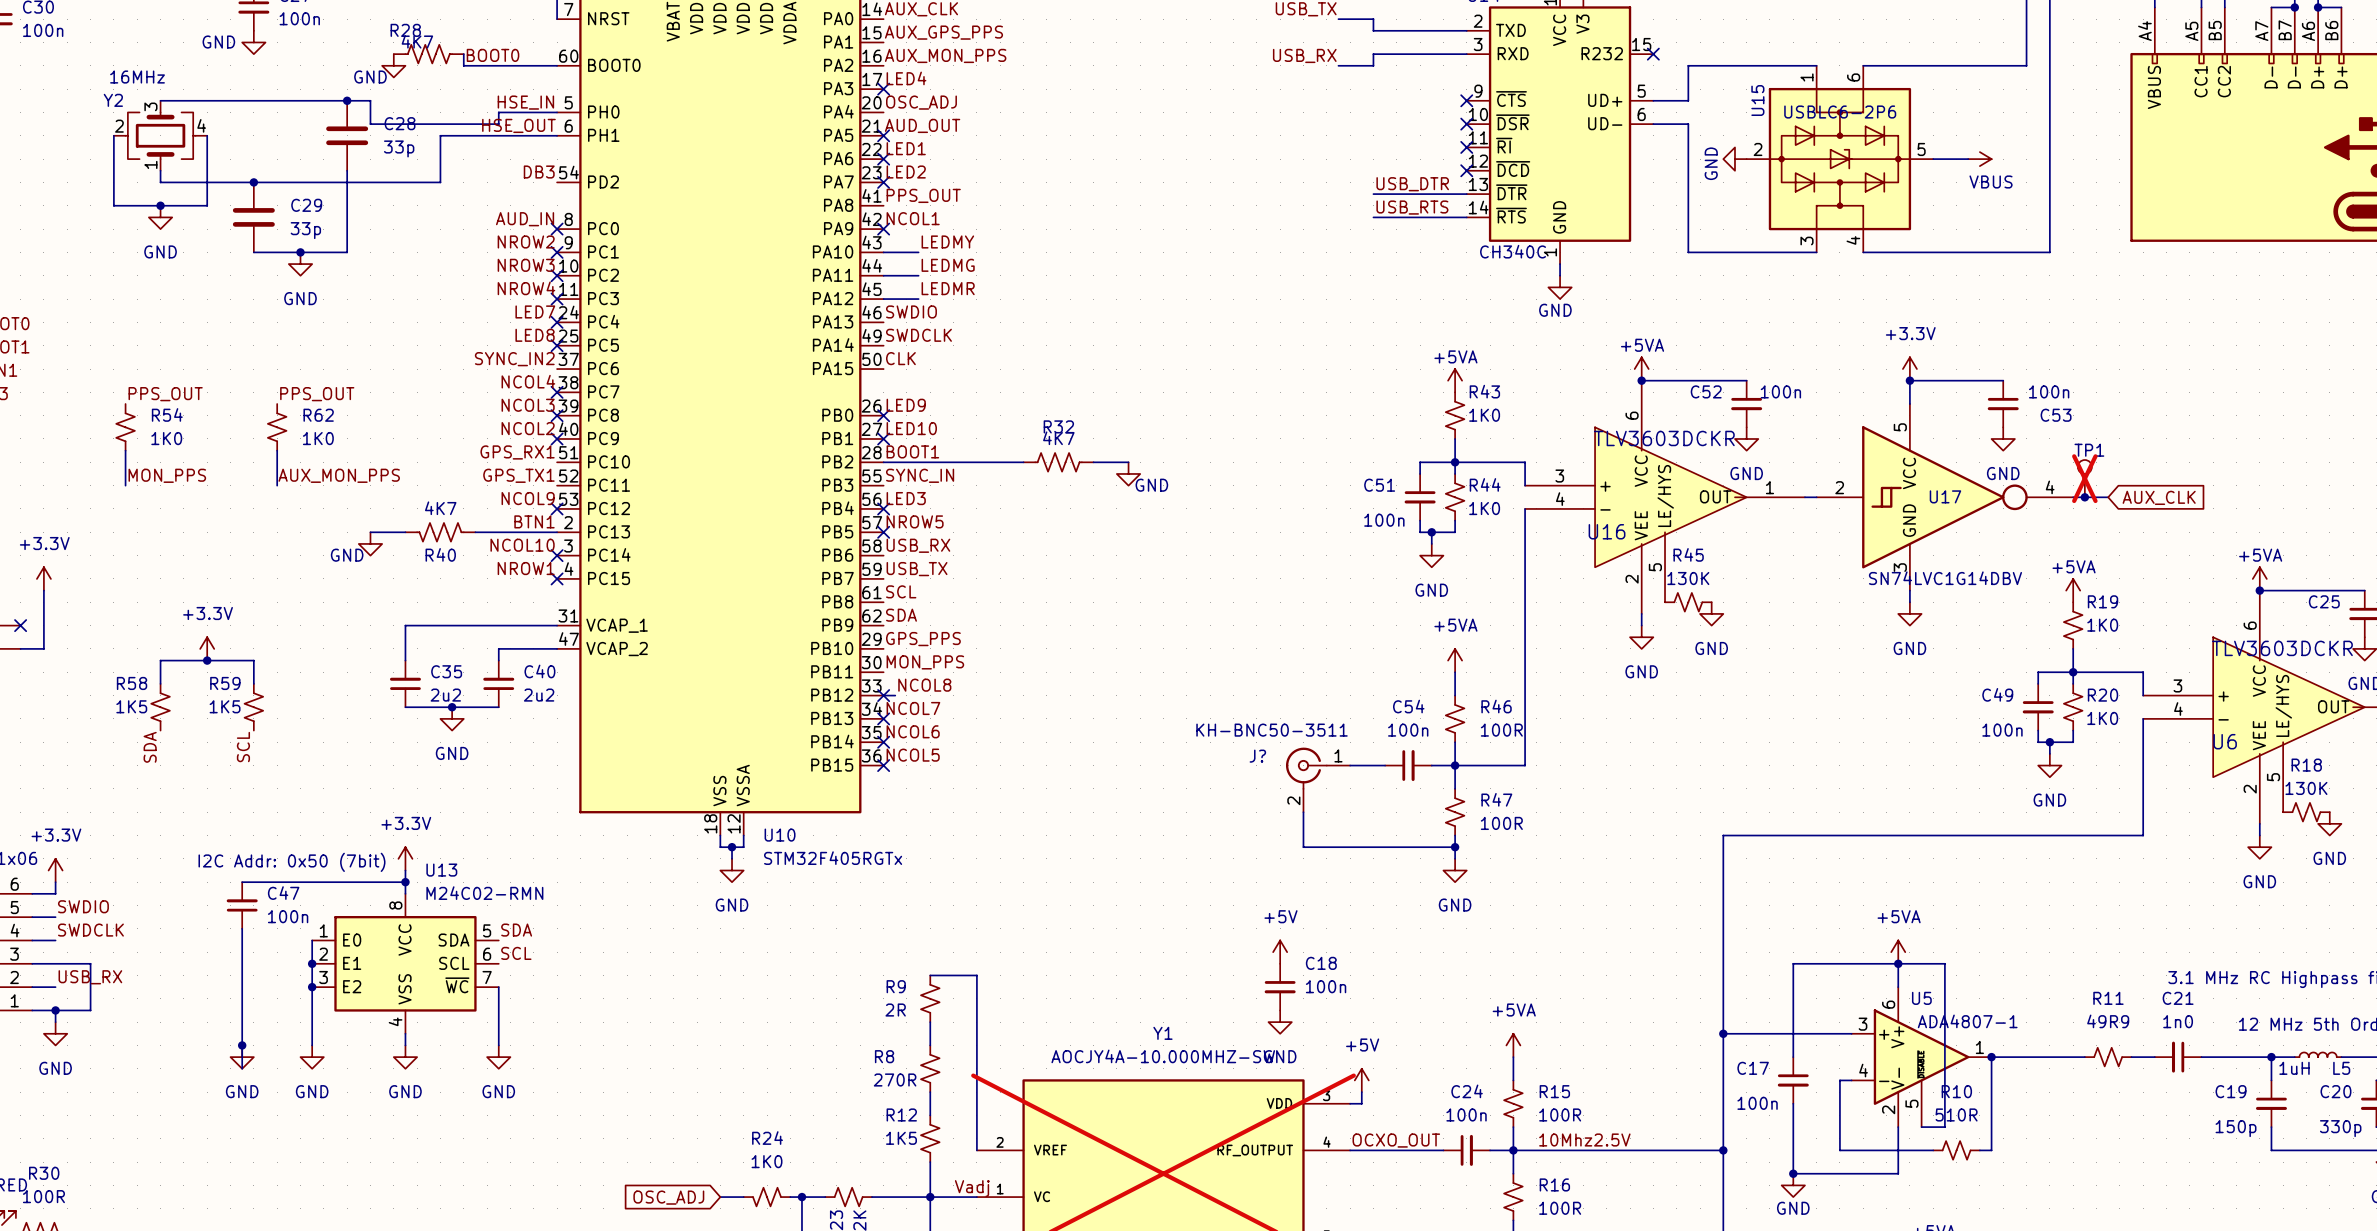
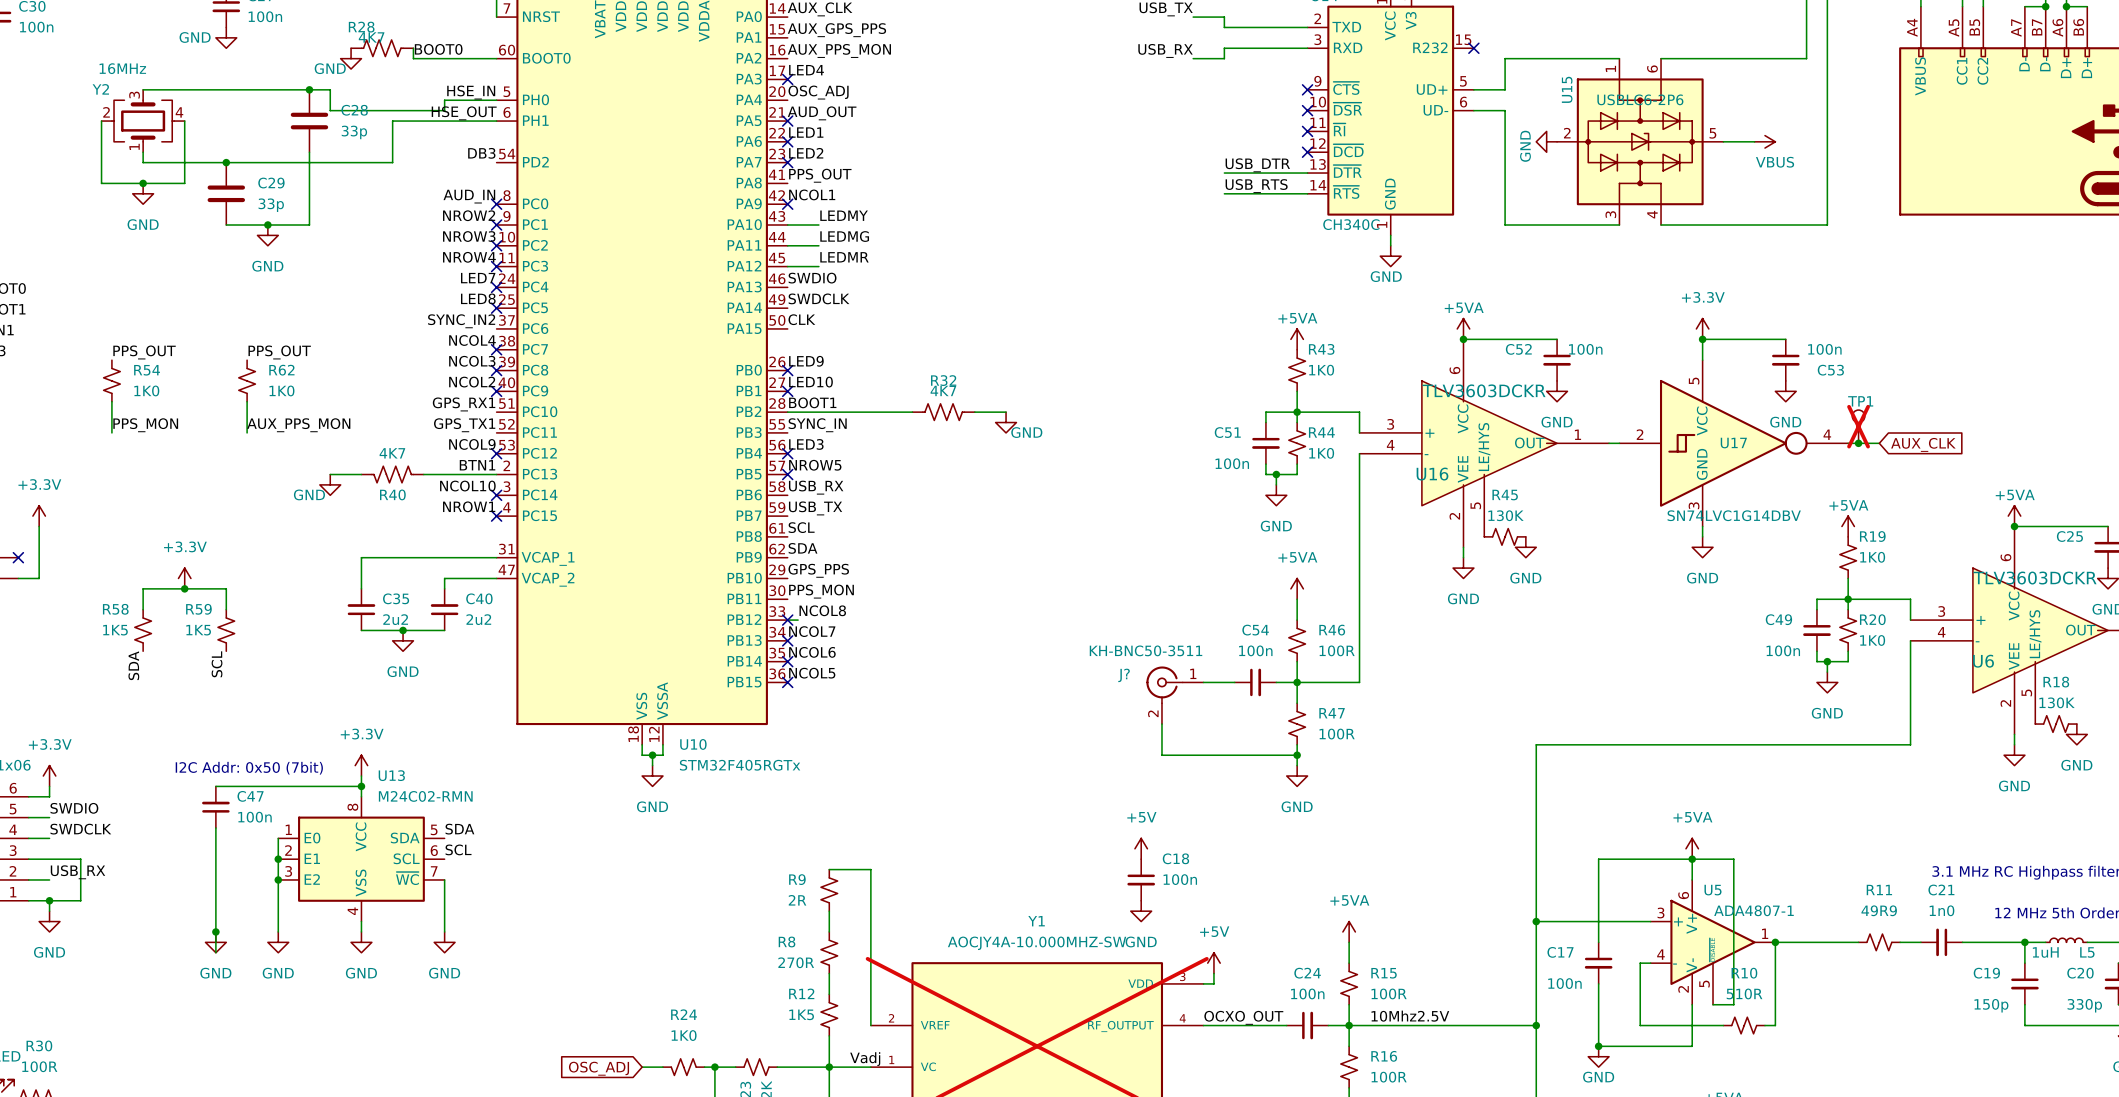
label: AUX_MON_PPS (945, 55) -> AUX_PPS_MON (839, 50)
label: MON_PPS (167, 475) -> PPS_MON (145, 425)
label: AUX_MON_PPS (339, 475) -> AUX_PPS_MON (298, 425)
label: MON_PPS (925, 662) -> PPS_MON (821, 591)

